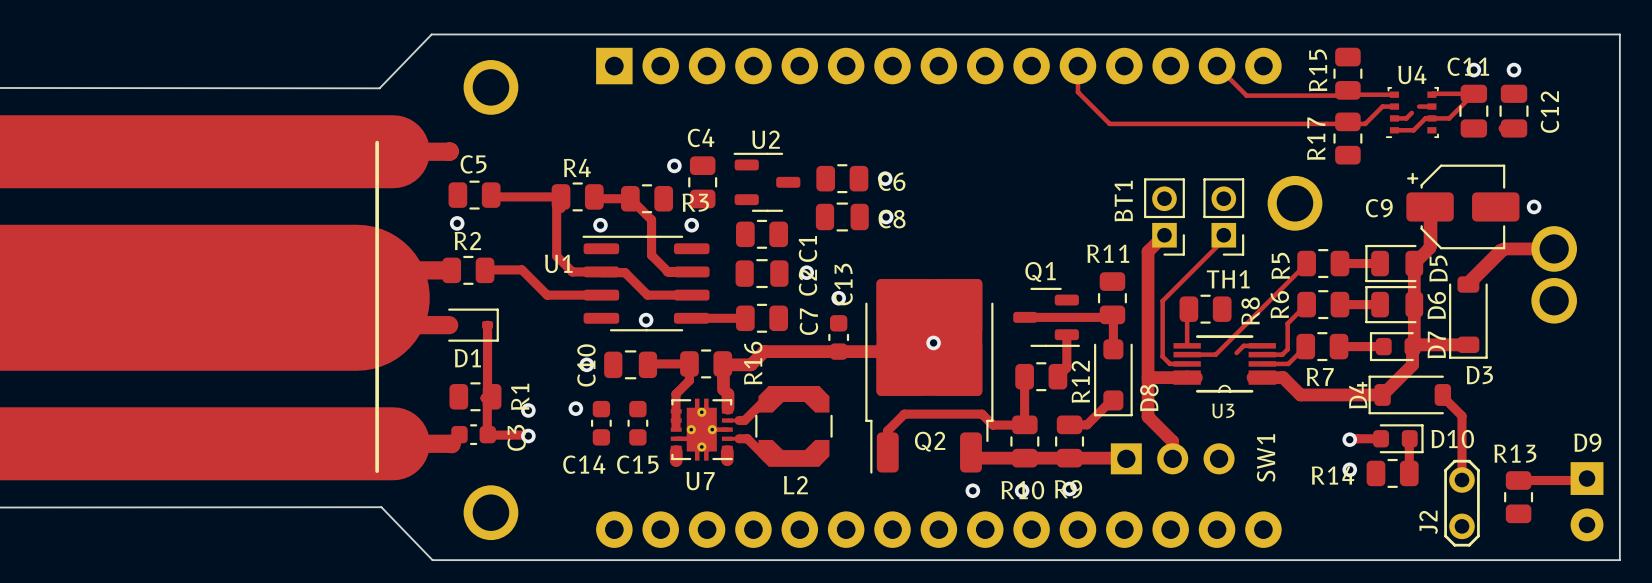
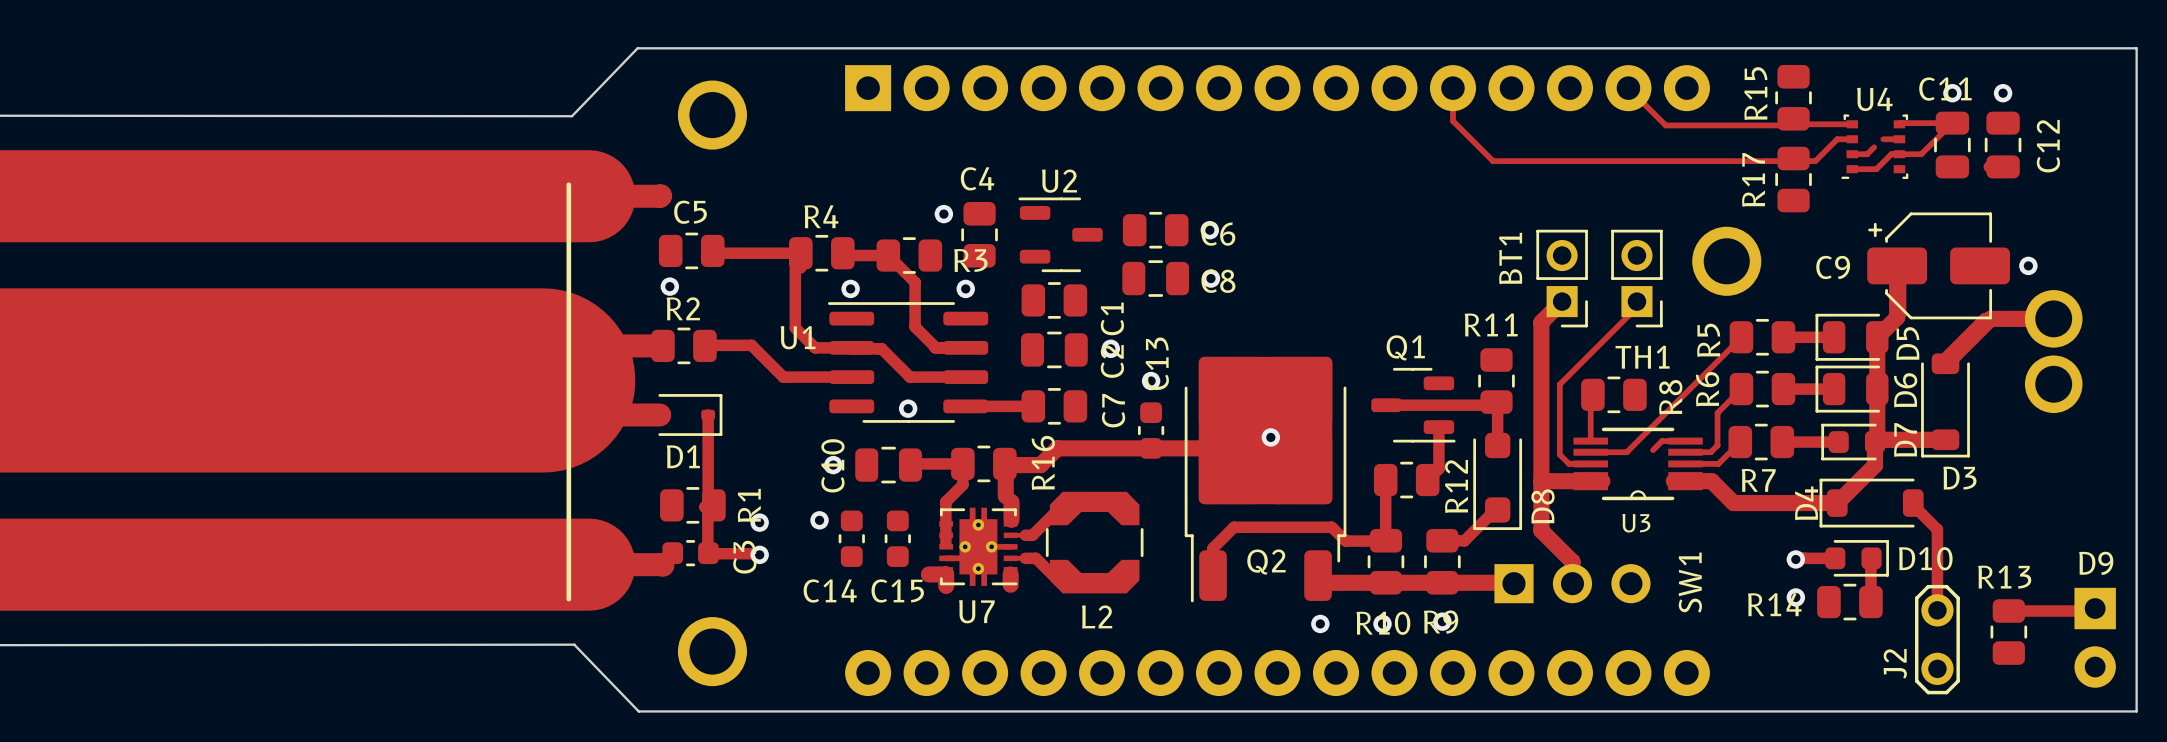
track: none -> (928, 574) (946, 574)

